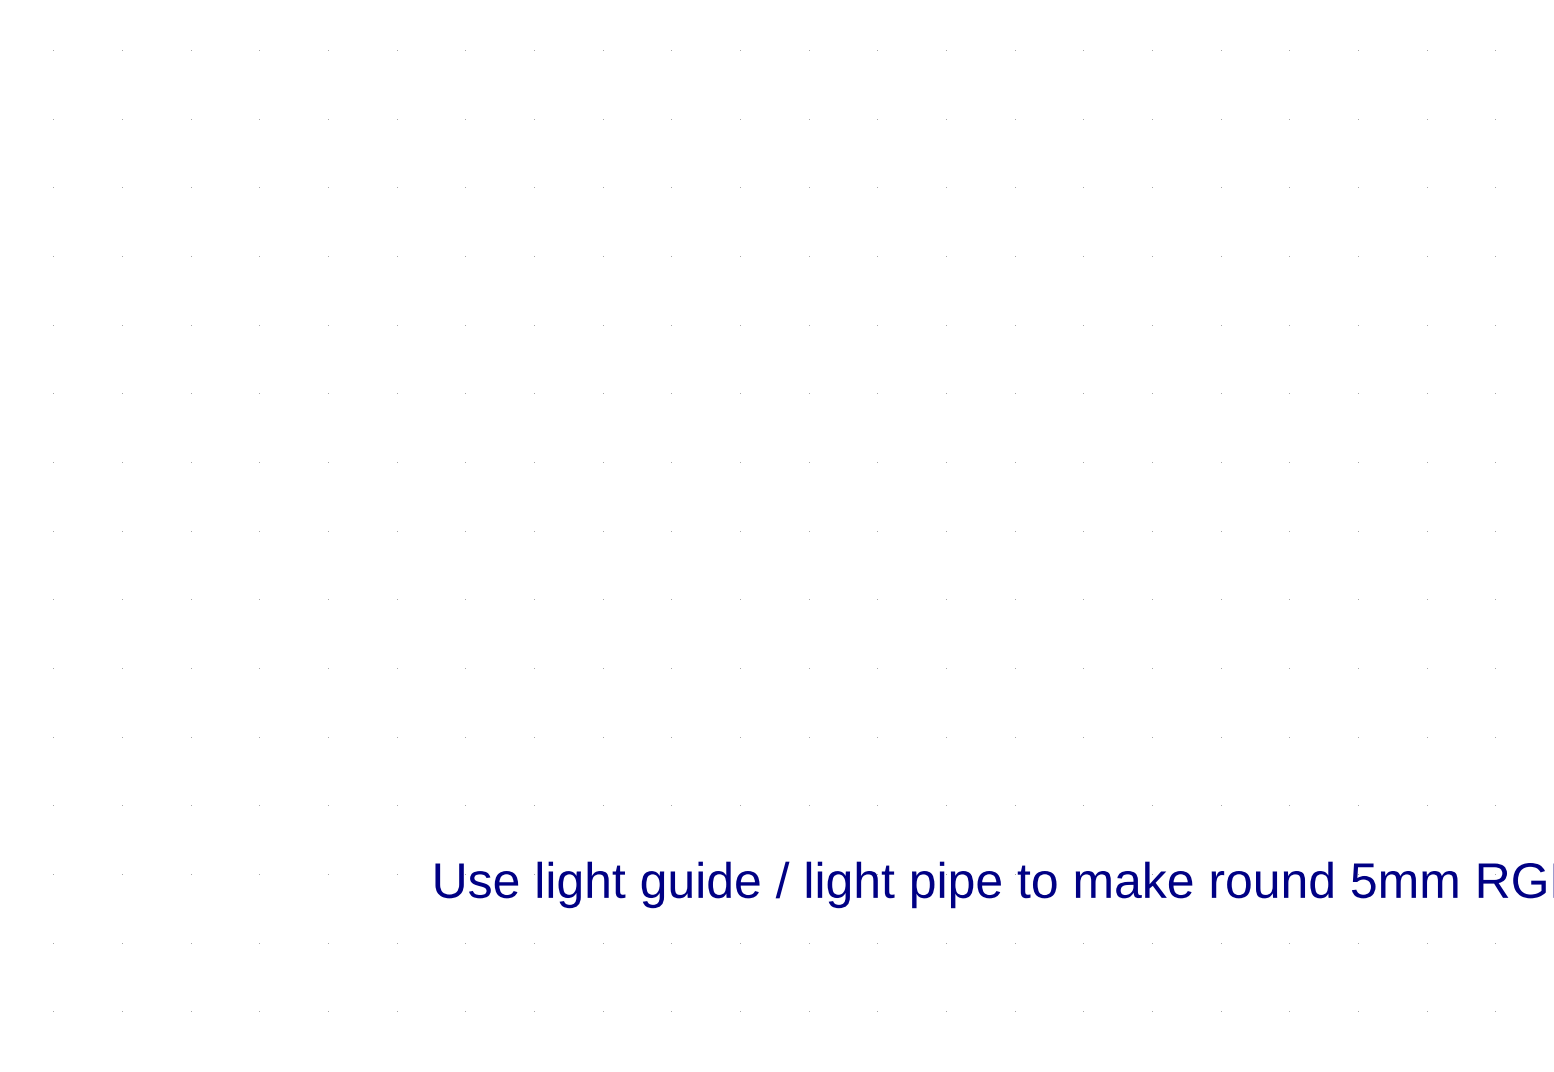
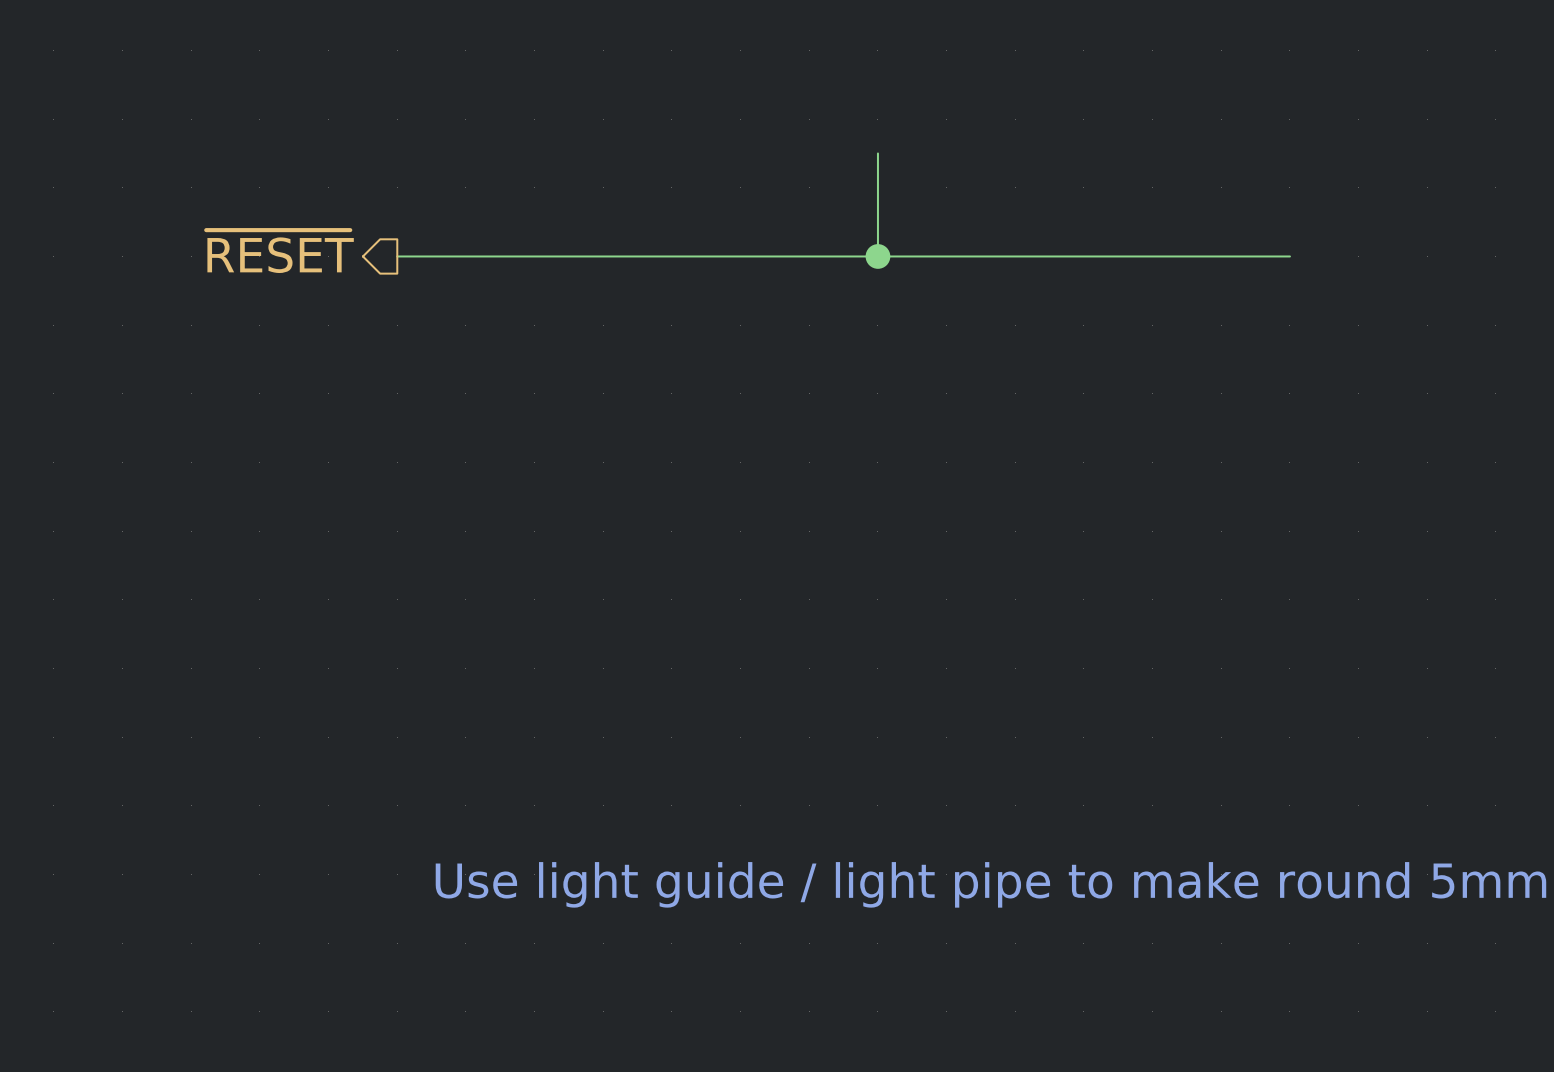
wire: none -> (877, 153) (877, 256)
hierarchical label: none -> ~{RESET} (280, 251)
wire: none -> (397, 256) (1289, 256)
junction: none -> (877, 256)

